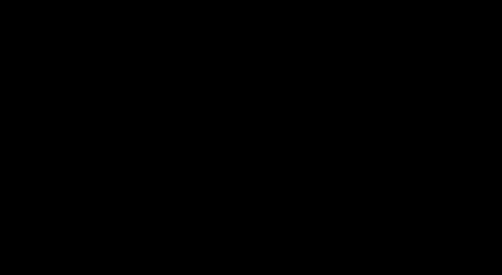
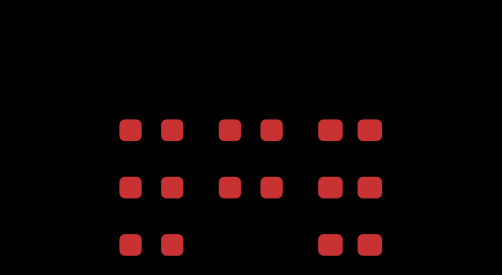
part: none -> (151, 130)
part: none -> (250, 130)
part: none -> (350, 130)
part: none -> (151, 187)
part: none -> (250, 187)
part: none -> (350, 187)
part: none -> (151, 244)
part: none -> (350, 244)

